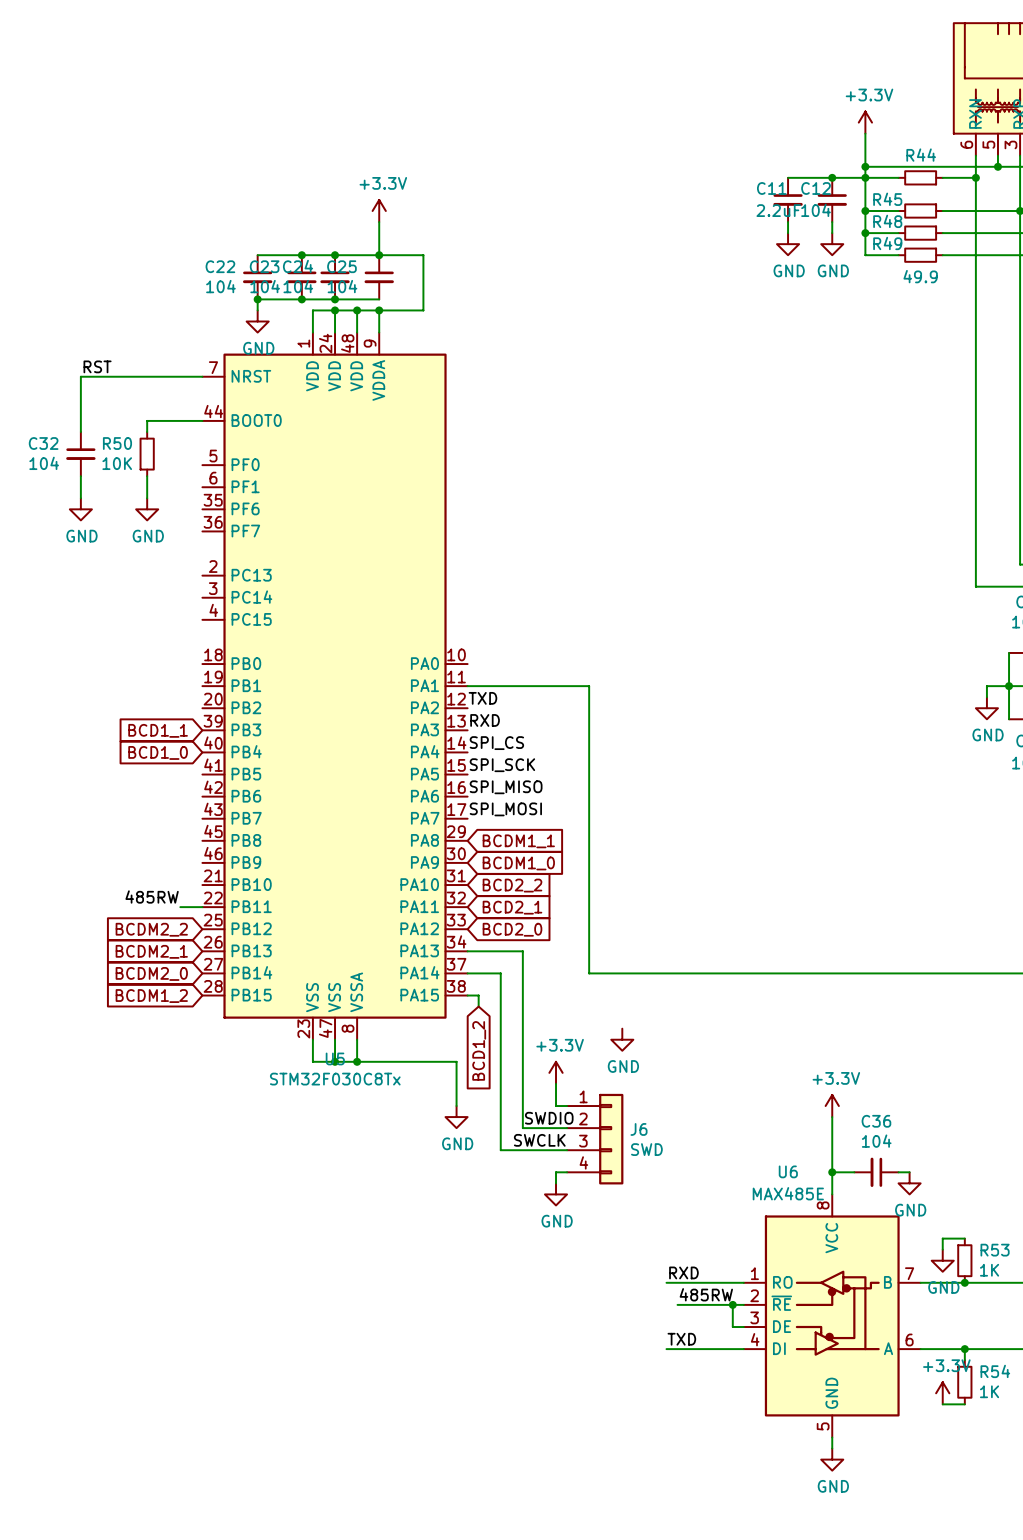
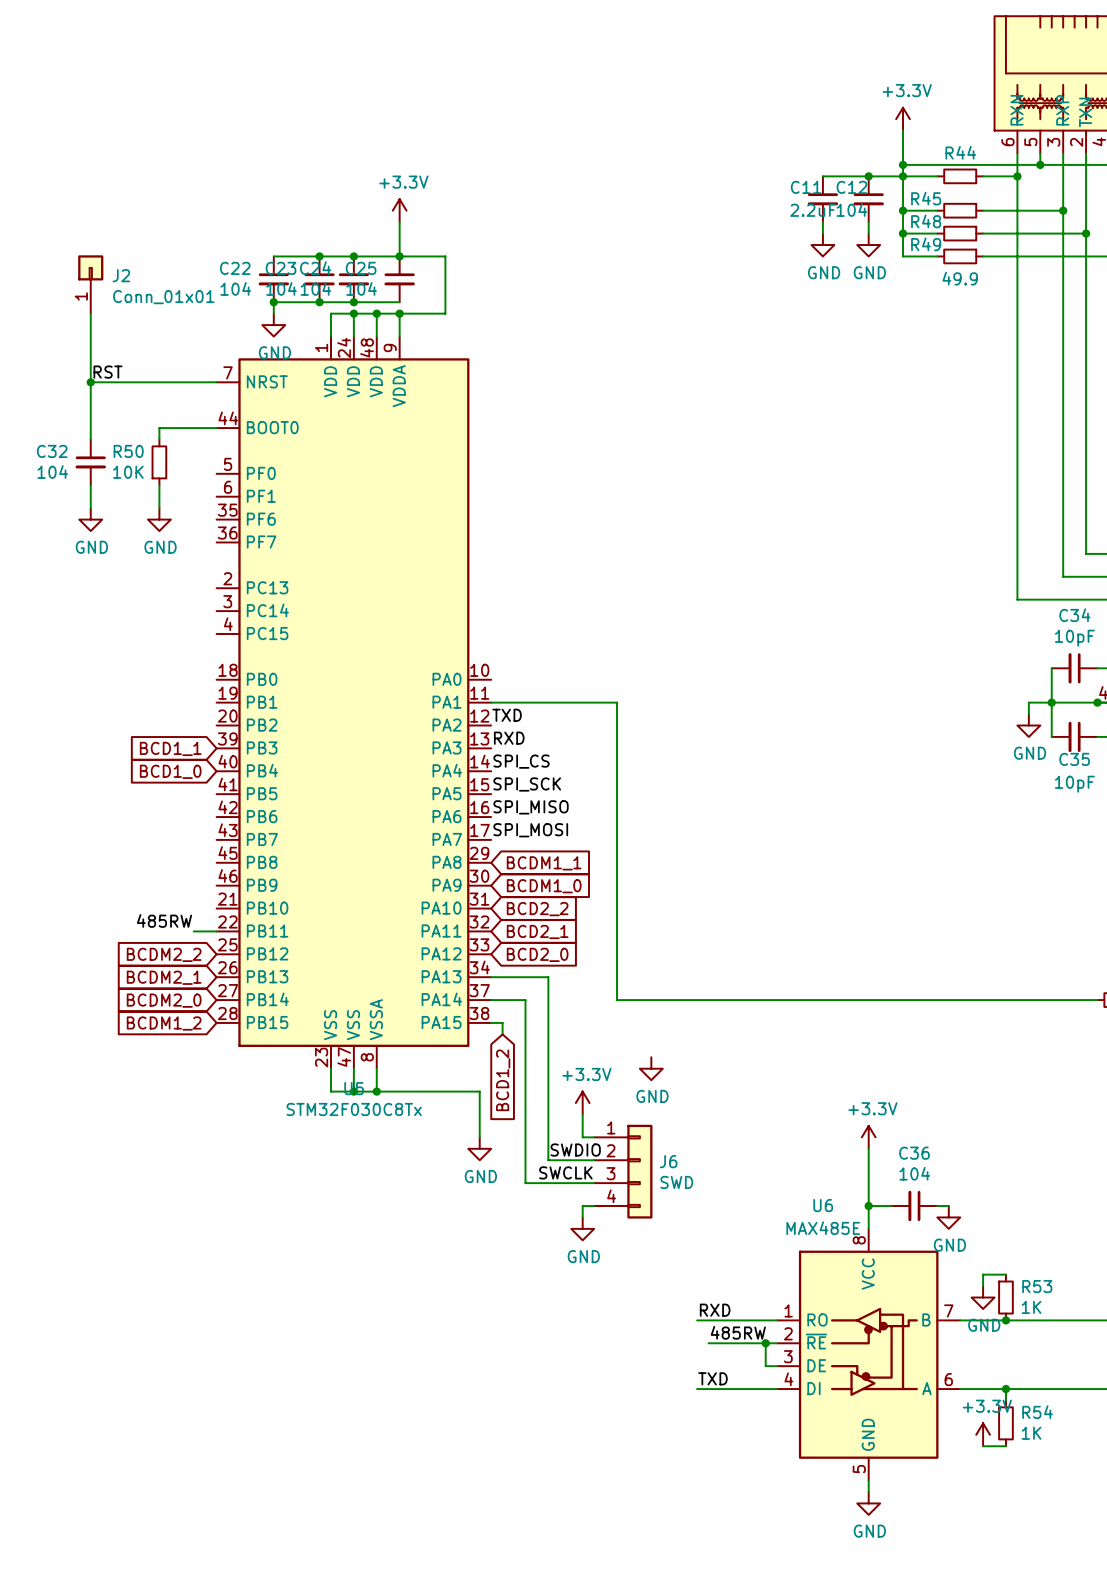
J2: none -> Conn_01x01 (90, 284)
wire: none -> (90, 313) (90, 382)
junction: none -> (90, 382)

